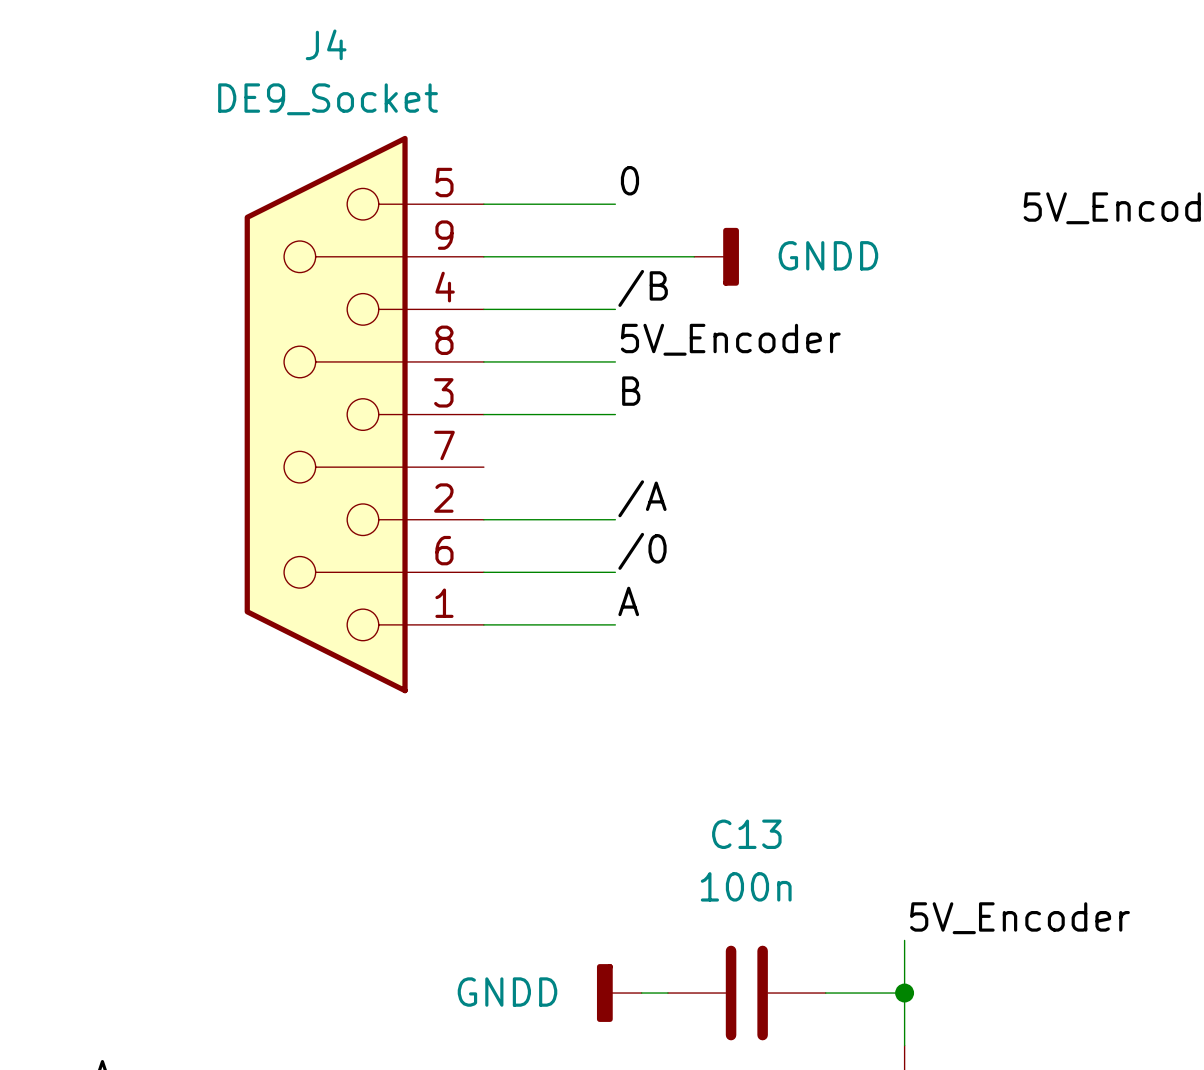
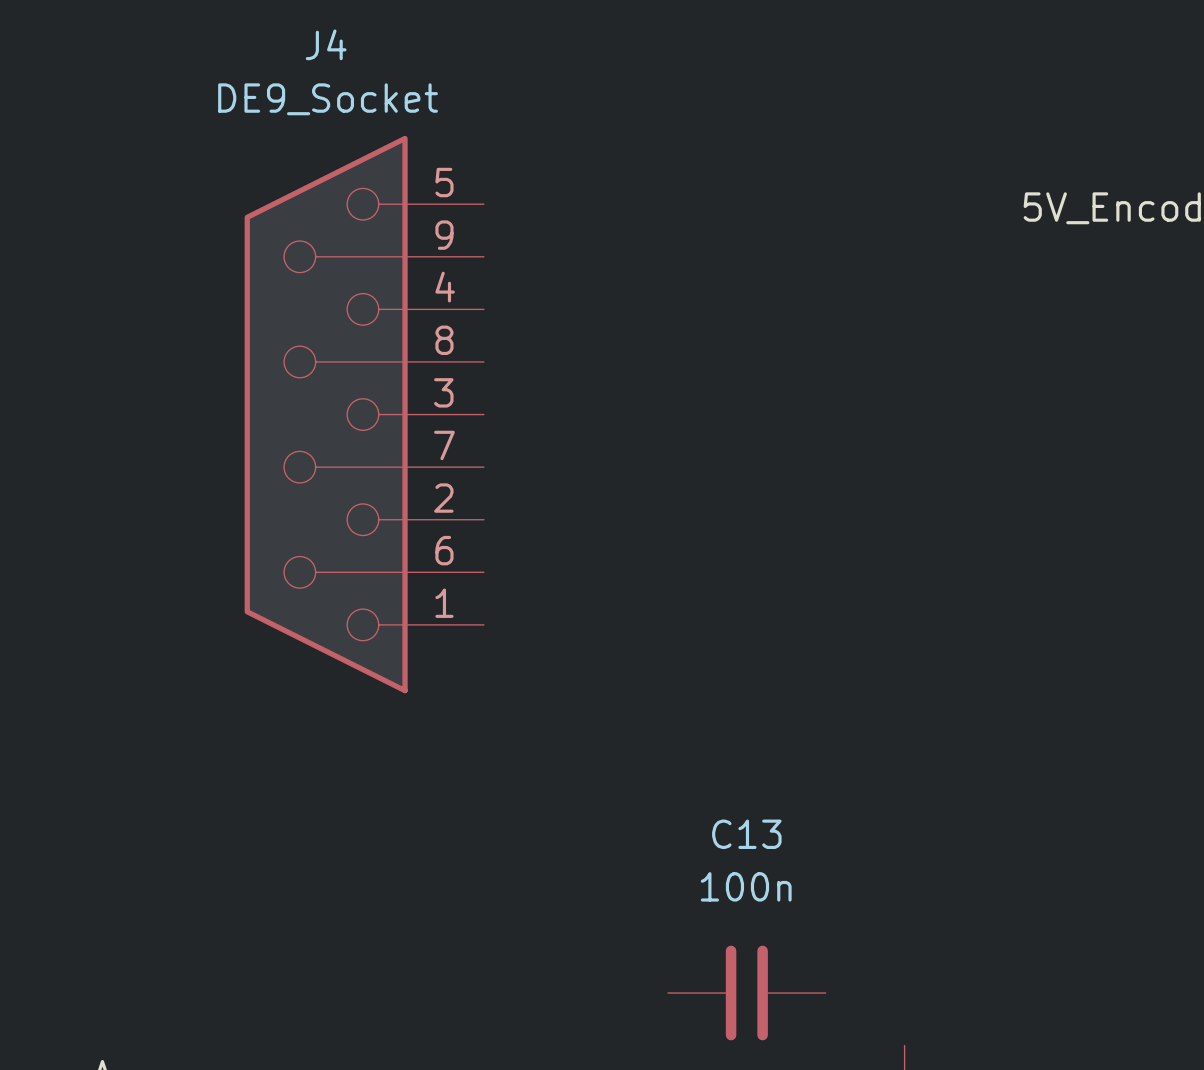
label: 0 (629, 180) -> none
wire: (483, 204) (615, 204) -> none
wire: (483, 256) (694, 256) -> none
power symbol: GNDD (716, 256) -> none
label: /B (643, 288) -> none
wire: (483, 309) (615, 309) -> none
label: 5V_Encoder (730, 339) -> none
wire: (483, 361) (615, 361) -> none
label: B (631, 391) -> none
wire: (483, 414) (615, 414) -> none
label: /A (642, 498) -> none
wire: (483, 519) (615, 519) -> none
label: /0 (642, 551) -> none
wire: (483, 572) (615, 572) -> none
label: A (628, 601) -> none
wire: (483, 624) (615, 624) -> none
label: 5V_Encoder (1019, 918) -> none
wire: (904, 940) (904, 1045) -> none
power symbol: GNDD (619, 993) -> none
wire: (641, 993) (667, 993) -> none
wire: (825, 993) (904, 993) -> none
junction: (904, 993) -> none

